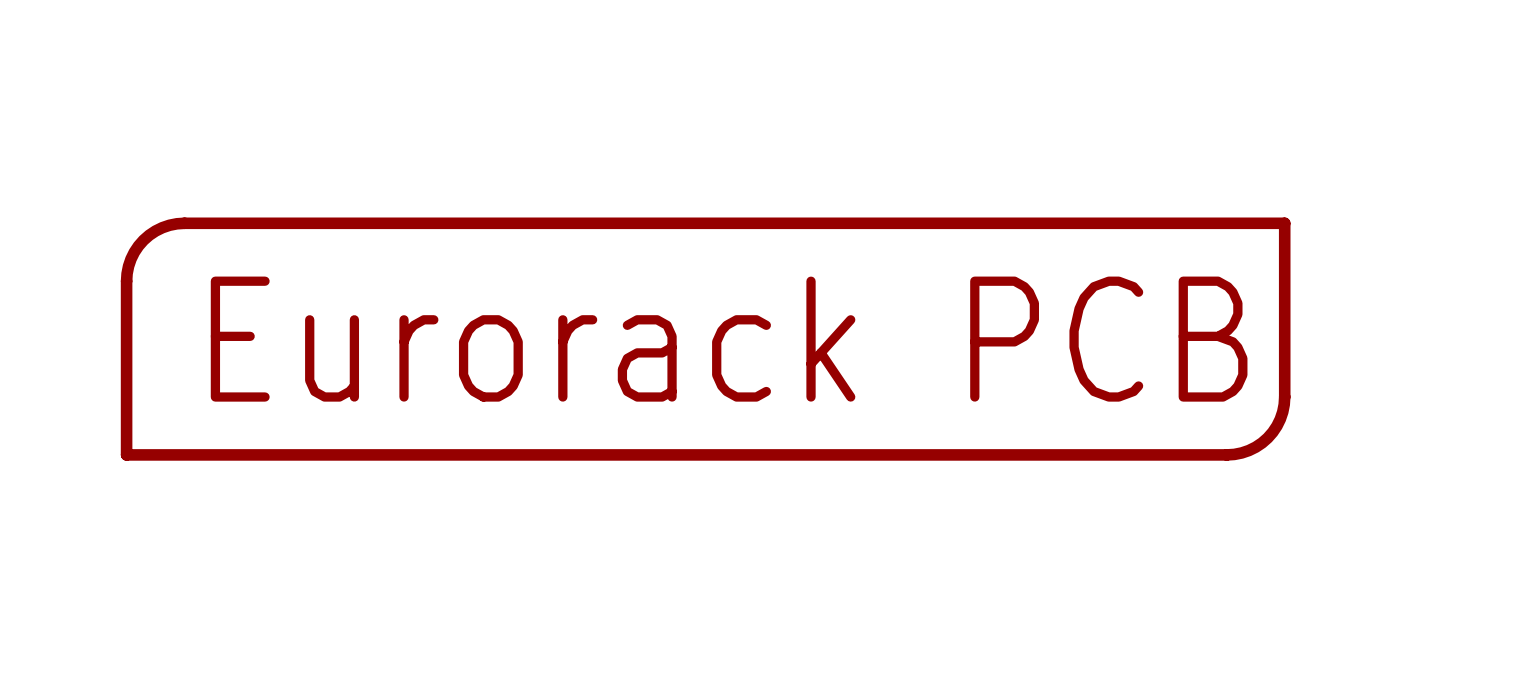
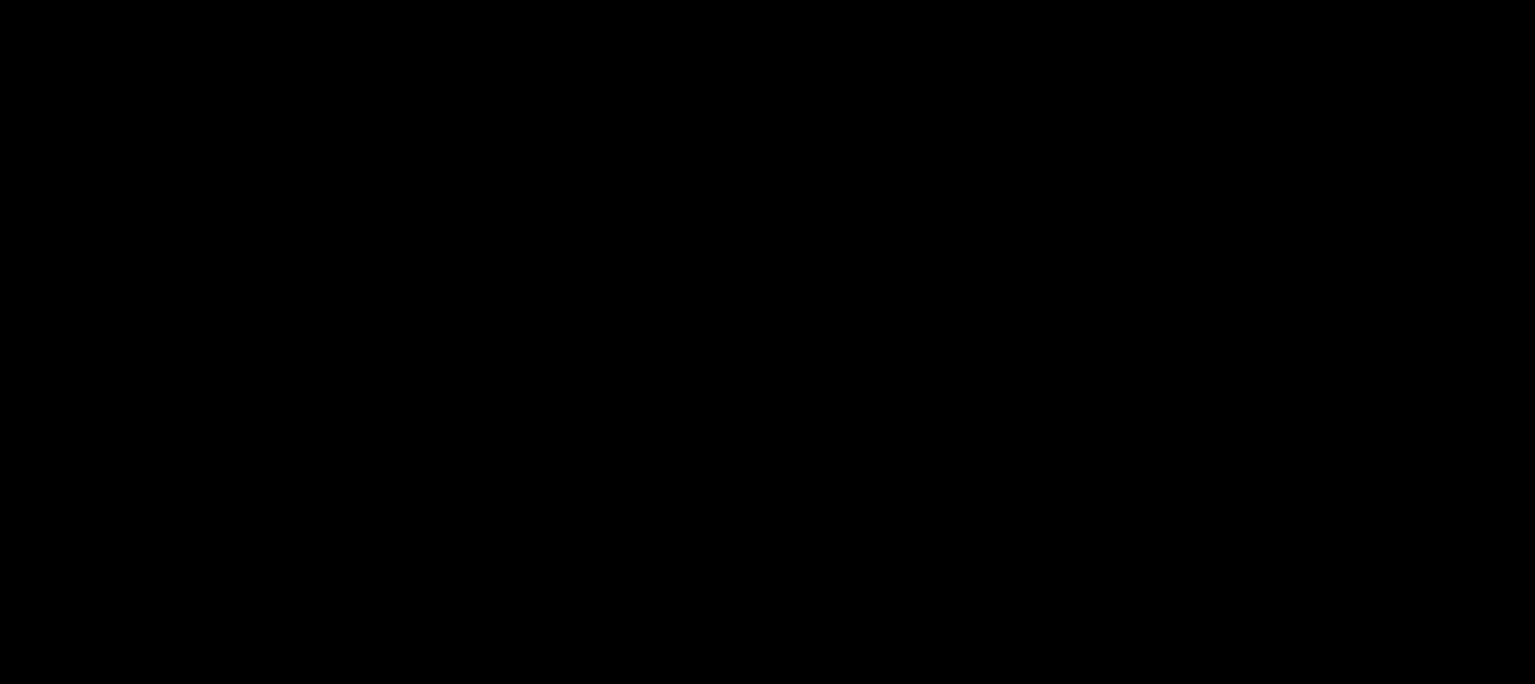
part: (705, 339) -> none

